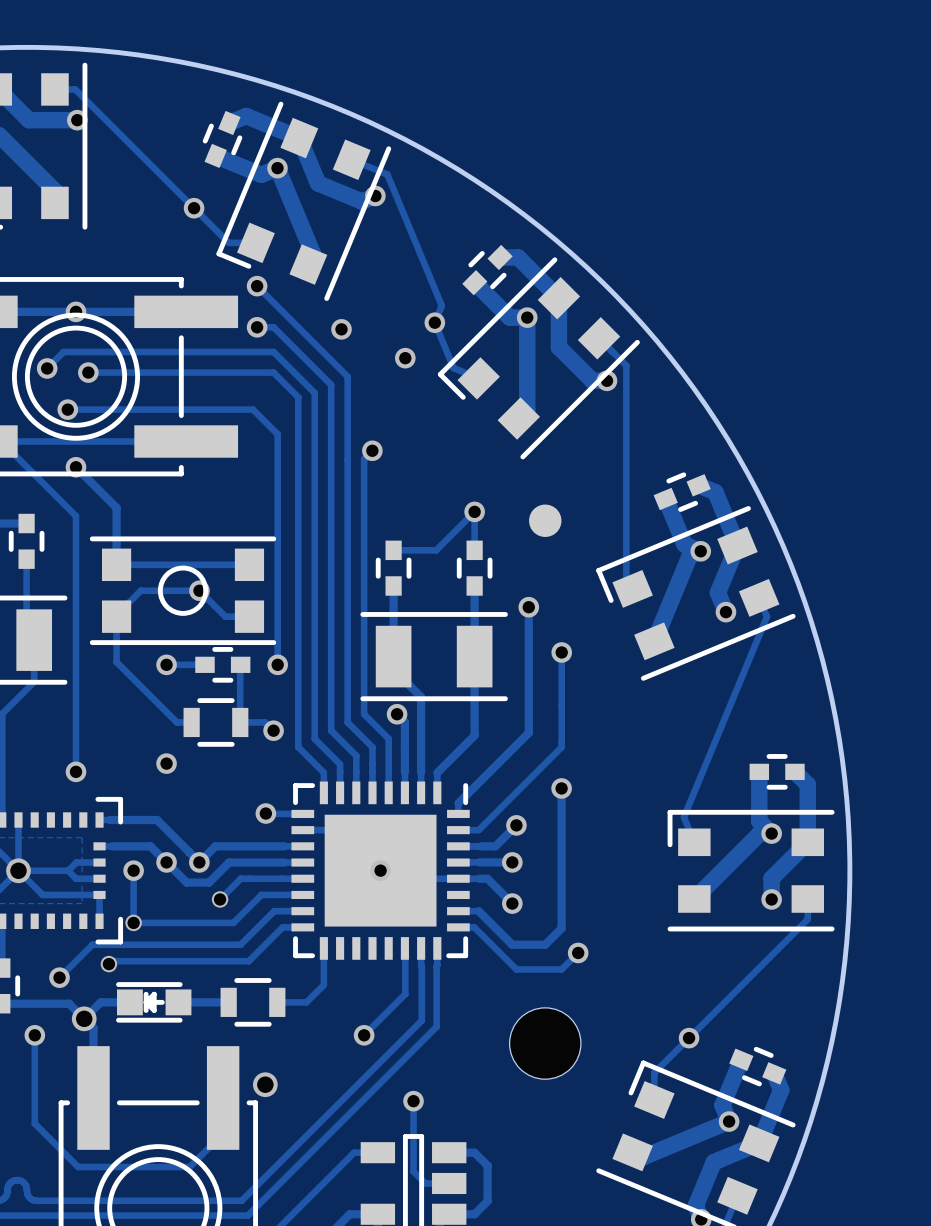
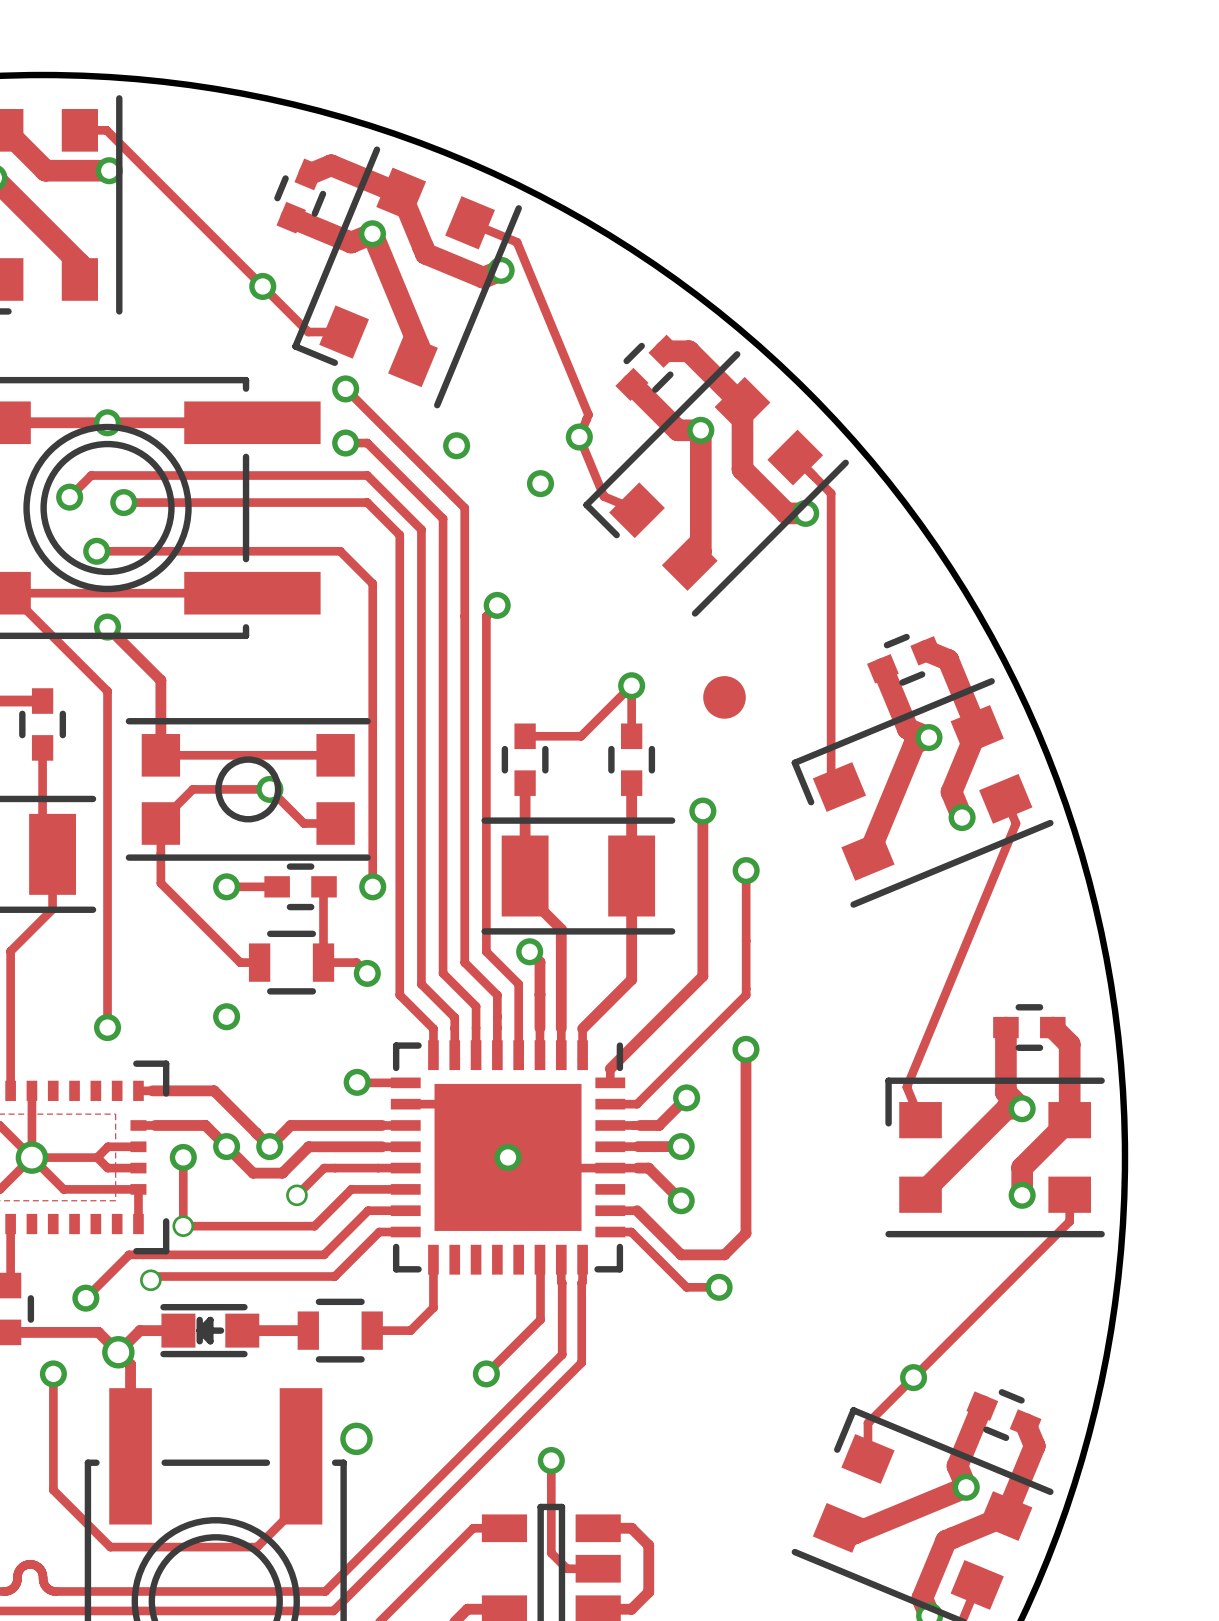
track: (578, 952) (561, 969) (541, 969) -> none
via position: (578, 952) -> (719, 1287)
part: (545, 1043) -> none

